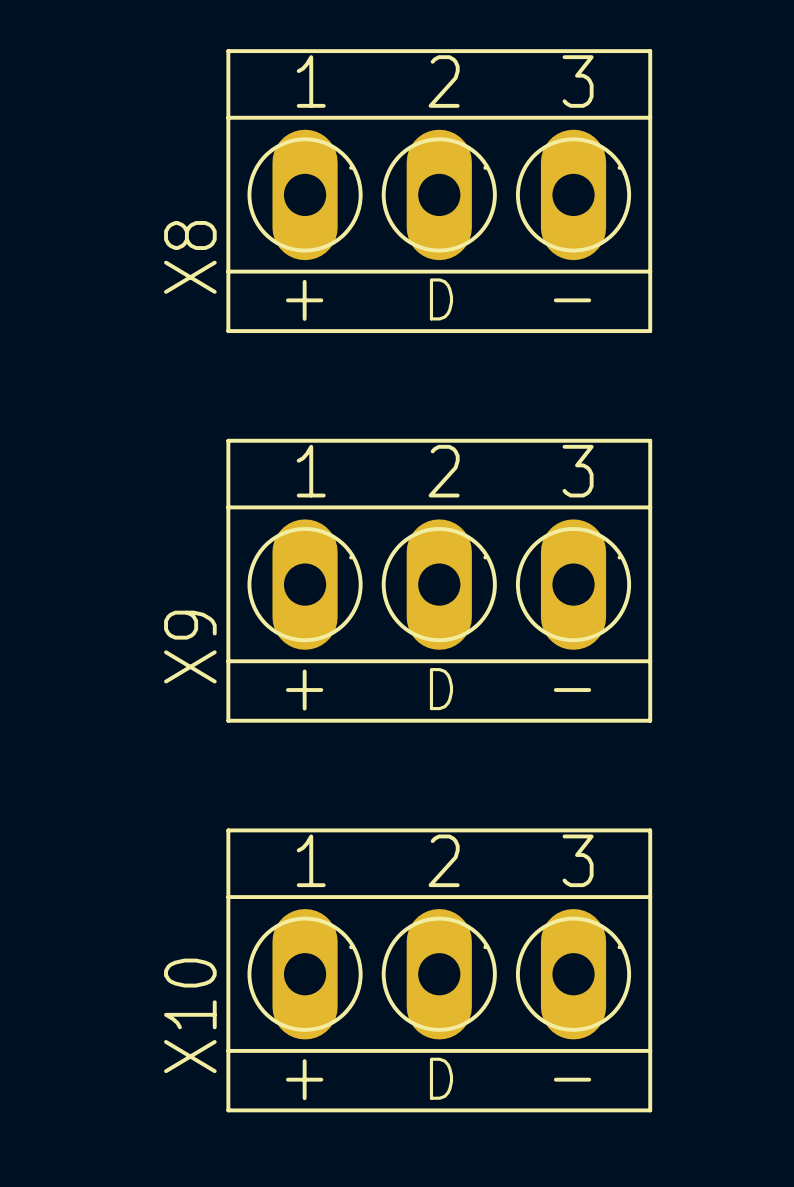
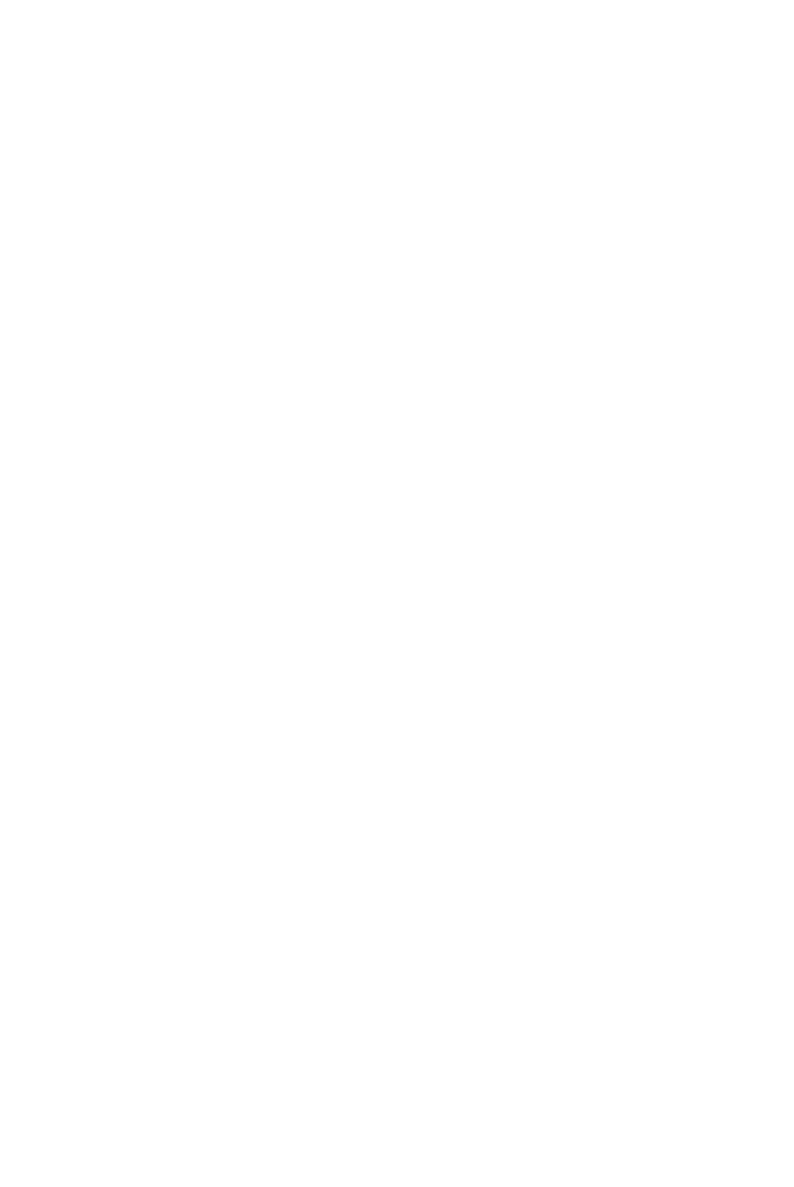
X8: (439, 191) -> none
X9: (439, 580) -> none
X10: (439, 970) -> none

